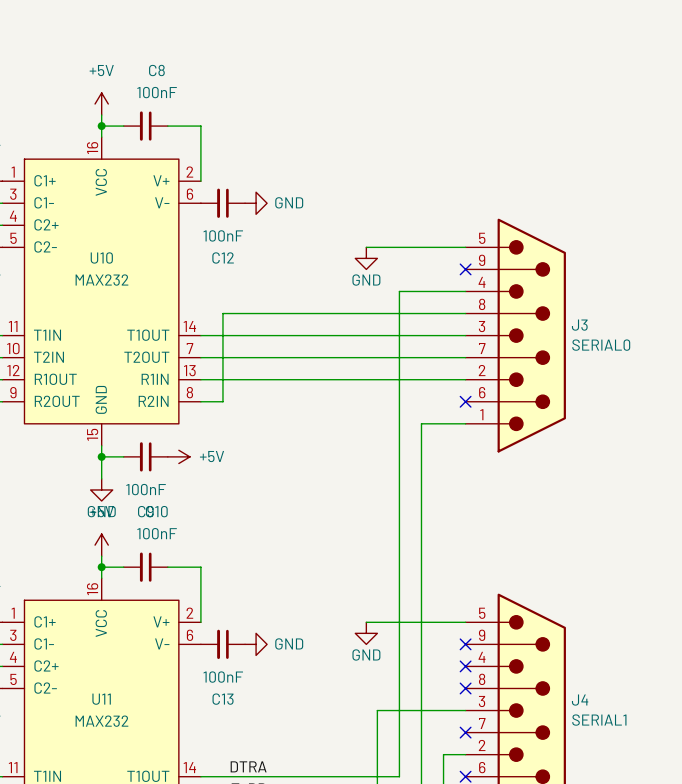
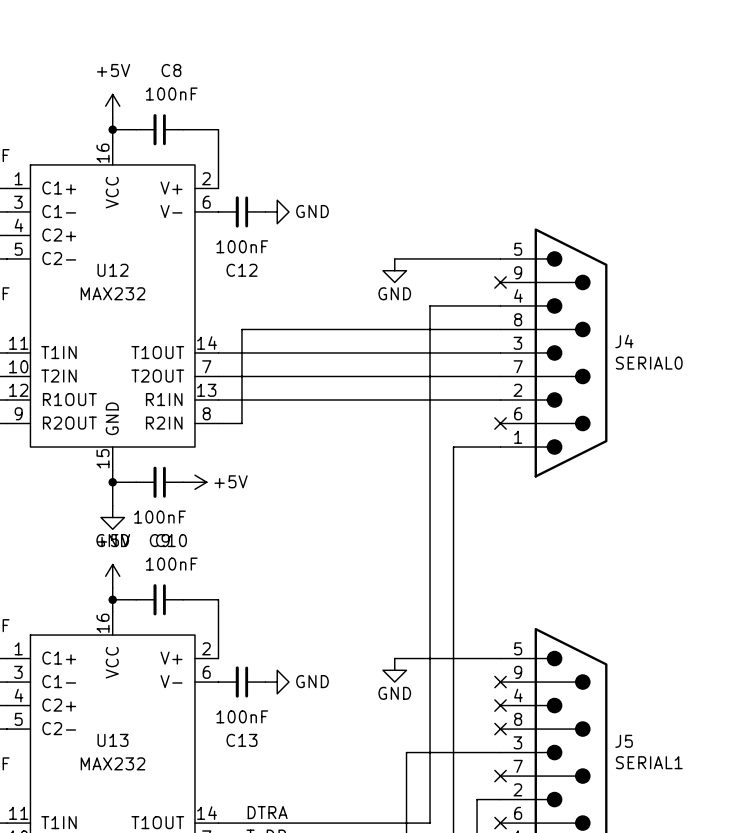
U10 name: U10 (101, 257) -> U12 (112, 270)
J3 name: J3 (579, 325) -> J4 (624, 341)
U11 name: U11 (101, 699) -> U13 (112, 740)
J4 name: J4 (580, 700) -> J5 (624, 741)

